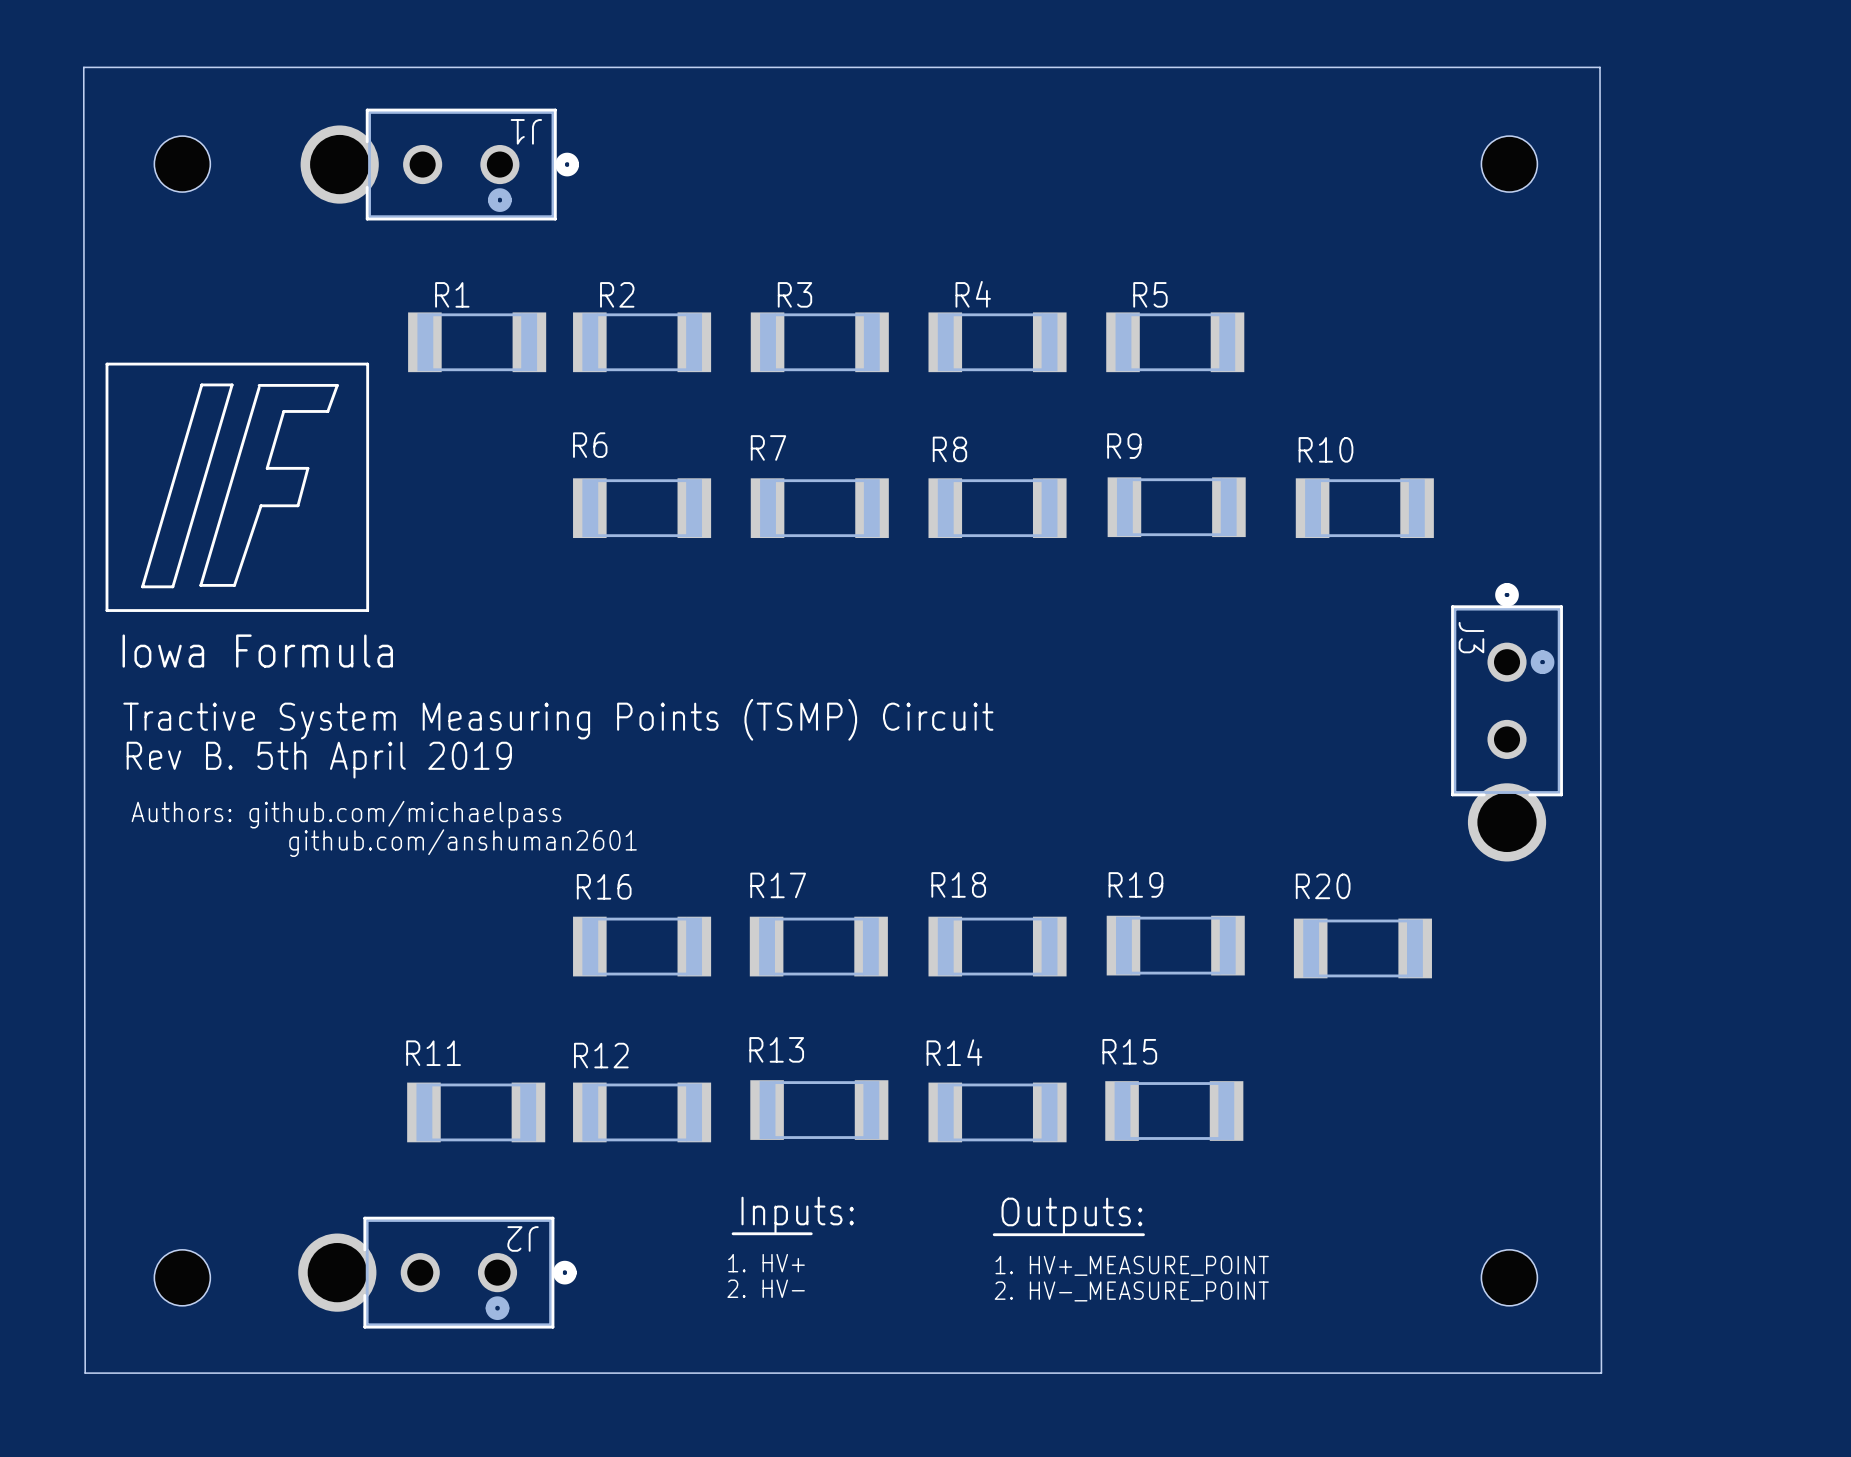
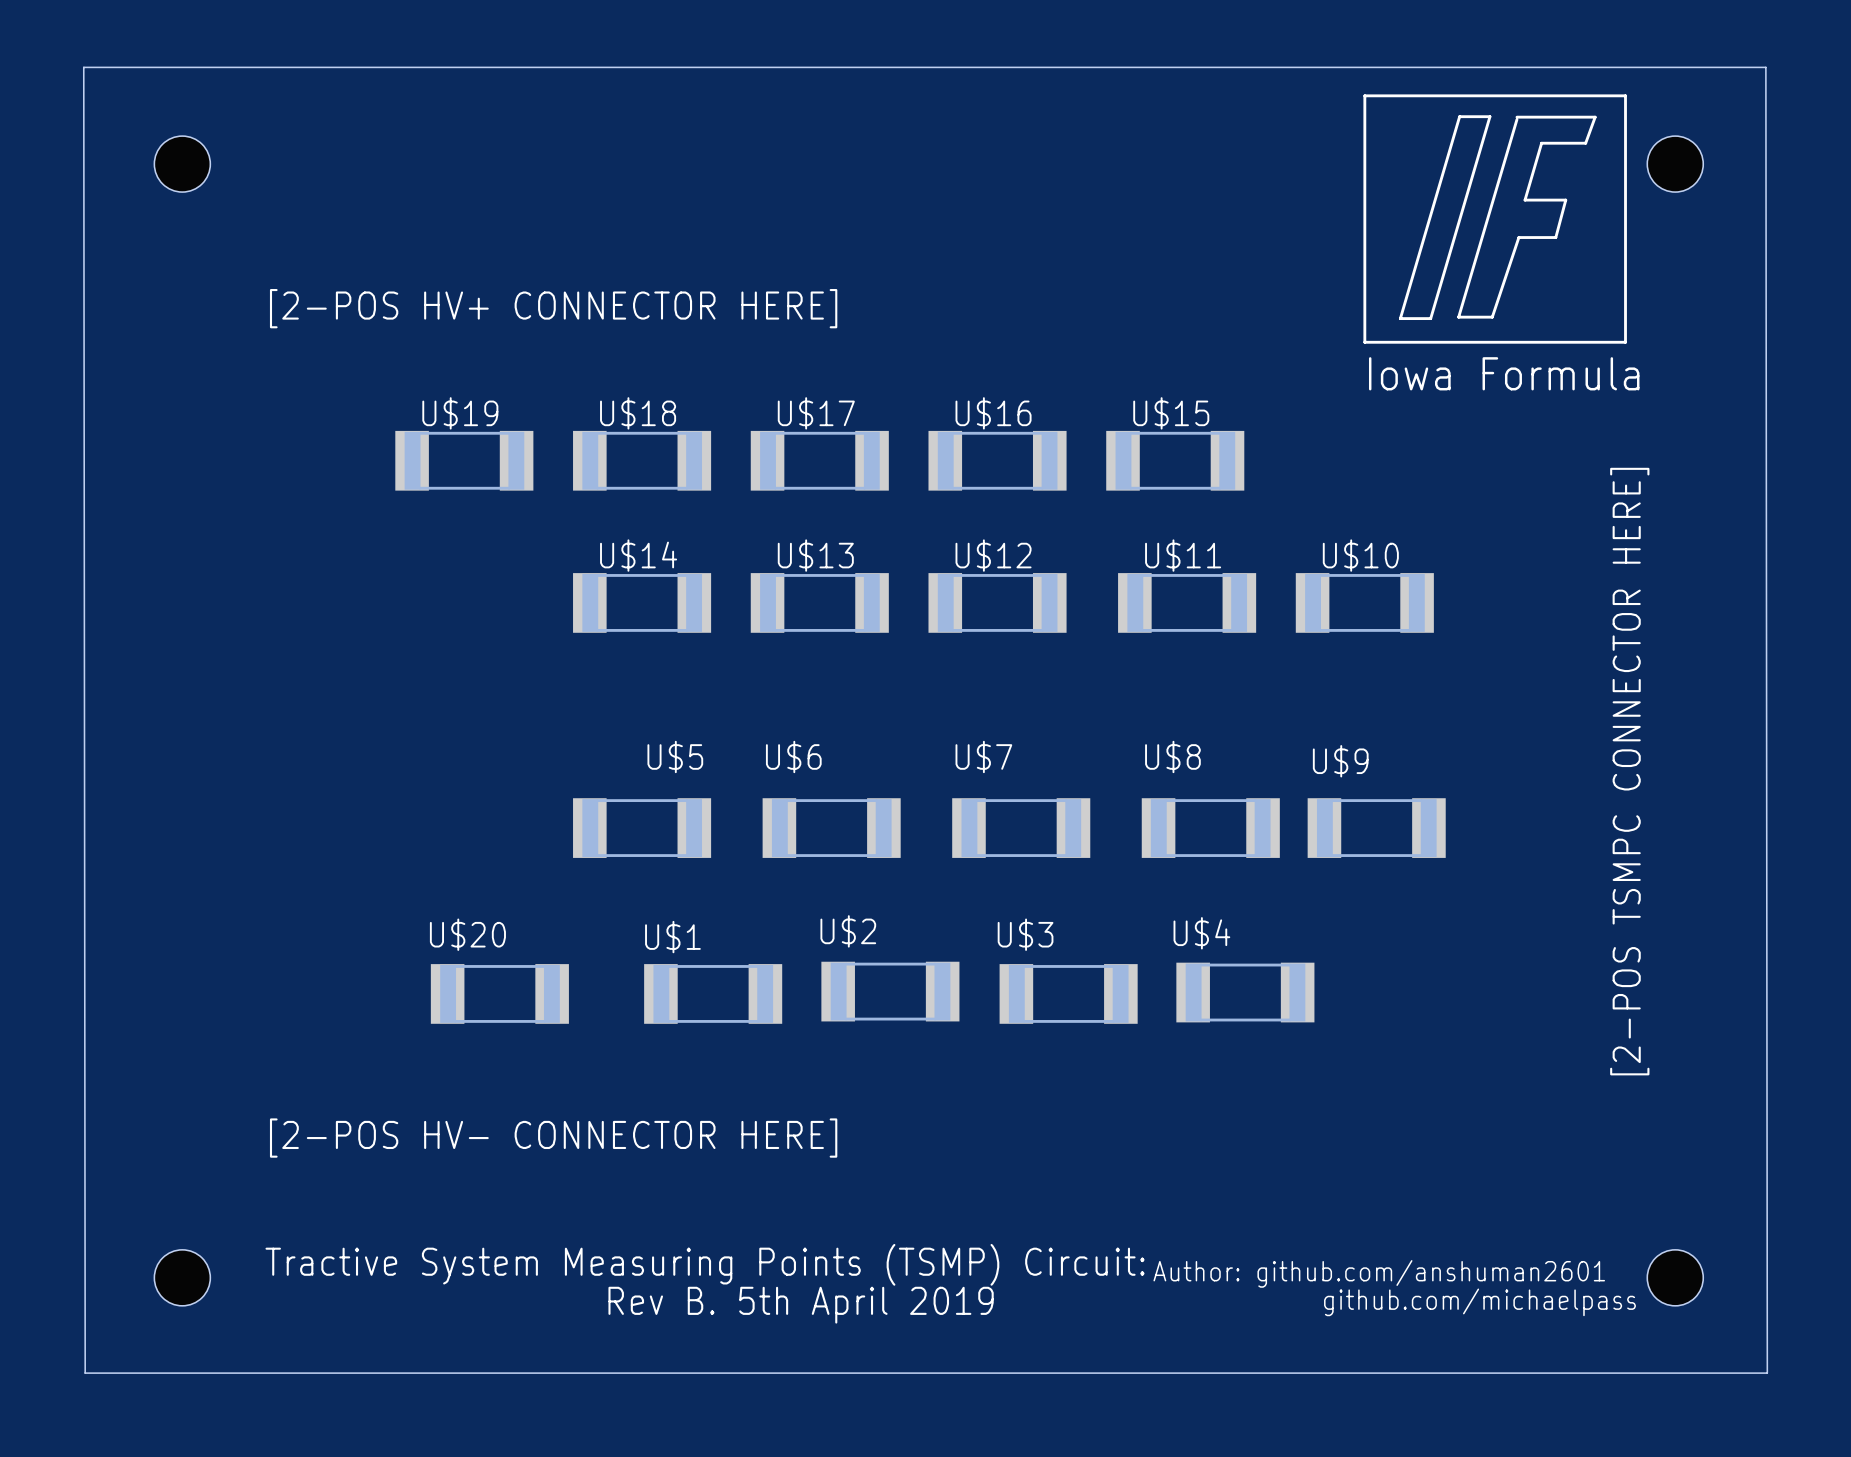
board edge: (1600, 67) (1601, 1373) -> (1600, 67) (1765, 67) (1767, 1373) (1601, 1373)
line: none -> (1364, 95) (1364, 342) (1625, 342) (1625, 95) (1364, 95)
line: none -> (1459, 116) (1400, 318) (1430, 318) (1489, 116) (1459, 116)
line: none -> (1516, 117) (1595, 117) (1585, 143) (1541, 143) (1525, 200) (1565, 200) (1555, 237) (1518, 237) (1492, 317) (1458, 317) (1516, 119)
J1: (439, 164) -> none
hole position: (1509, 164) -> (1675, 164)
text: none -> [2-POS HV+ CONNECTOR HERE] (553, 308)
R1: (477, 342) -> none
R2: (642, 342) -> none
R3: (819, 342) -> none
R4: (997, 342) -> none
R5: (1175, 342) -> none
line: (106, 364) (106, 610) (367, 610) (367, 364) (106, 364) -> none
text: none -> Iowa Formula (1504, 373)
line: (201, 384) (142, 586) (172, 586) (232, 384) (201, 384) -> none
line: (259, 385) (337, 385) (327, 411) (283, 411) (267, 468) (307, 468) (297, 505) (261, 505) (234, 585) (200, 585) (259, 387) -> none
U$19: none -> (464, 460)
U$18: none -> (642, 460)
U$17: none -> (819, 460)
U$16: none -> (997, 460)
U$15: none -> (1175, 460)
R9: (1176, 507) -> none
R6: (642, 508) -> none
R7: (819, 508) -> none
R8: (997, 508) -> none
R10: (1364, 508) -> none
U$14: none -> (642, 602)
U$13: none -> (819, 602)
U$12: none -> (997, 602)
U$11: none -> (1187, 602)
U$10: none -> (1364, 602)
text: Iowa Formula (257, 651) -> none
text: Tractive System Measuring Points (TSMP) Circuit (558, 719) -> none
J3: (1507, 722) -> none
text: Rev B. 5th April 2019 (319, 760) -> none
text: none -> [2-POS TSMPC CONNECTOR HERE] (1629, 771)
text: Authors: github.com/michaelpass (346, 814) -> none
U$5: none -> (642, 828)
U$6: none -> (831, 828)
U$7: none -> (1021, 828)
U$8: none -> (1210, 828)
U$9: none -> (1376, 828)
text: github.com/anshuman2601 (463, 843) -> none
R19: (1175, 945) -> none
R16: (642, 946) -> none
R17: (818, 946) -> none
R18: (997, 946) -> none
R20: (1362, 948) -> none
U$2: none -> (890, 991)
U$4: none -> (1245, 992)
U$20: none -> (499, 993)
U$1: none -> (713, 993)
U$3: none -> (1068, 993)
R13: (819, 1110) -> none
R15: (1174, 1111) -> none
R11: (476, 1112) -> none
R12: (642, 1112) -> none
R14: (997, 1112) -> none
text: none -> [2-POS HV- CONNECTOR HERE] (553, 1138)
text: Inputs: (797, 1215) -> none
text: Outputs: (1071, 1216) -> none
line: (733, 1233) (811, 1233) -> none
line: (994, 1234) (1143, 1234) -> none
text: 1. HV+ (766, 1263) -> none
text: none -> Tractive System Measuring Points (TSMP) Circuit: (705, 1264)
text: 1. HV+_MEASURE_POINT (1132, 1265) -> none
J2: (437, 1272) -> none
text: none -> Author: github.com/anshuman2601 (1379, 1273)
hole position: (1509, 1277) -> (1675, 1277)
text: 2. HV- (766, 1288) -> none
text: 2. HV-_MEASURE_POINT (1131, 1291) -> none
text: none -> github.com/michaelpass (1479, 1302)
text: none -> Rev B. 5th April 2019 (801, 1305)

